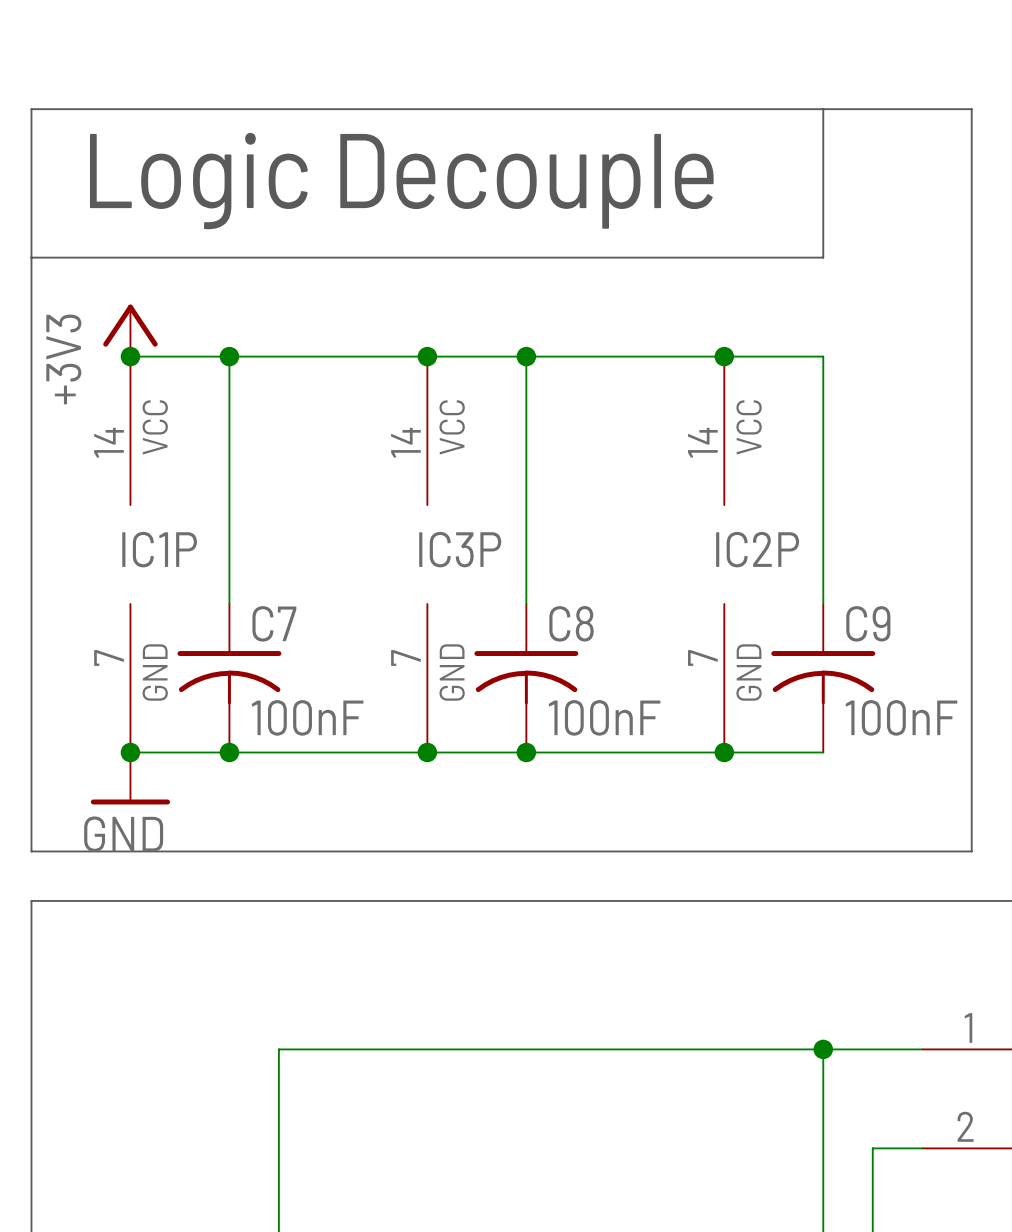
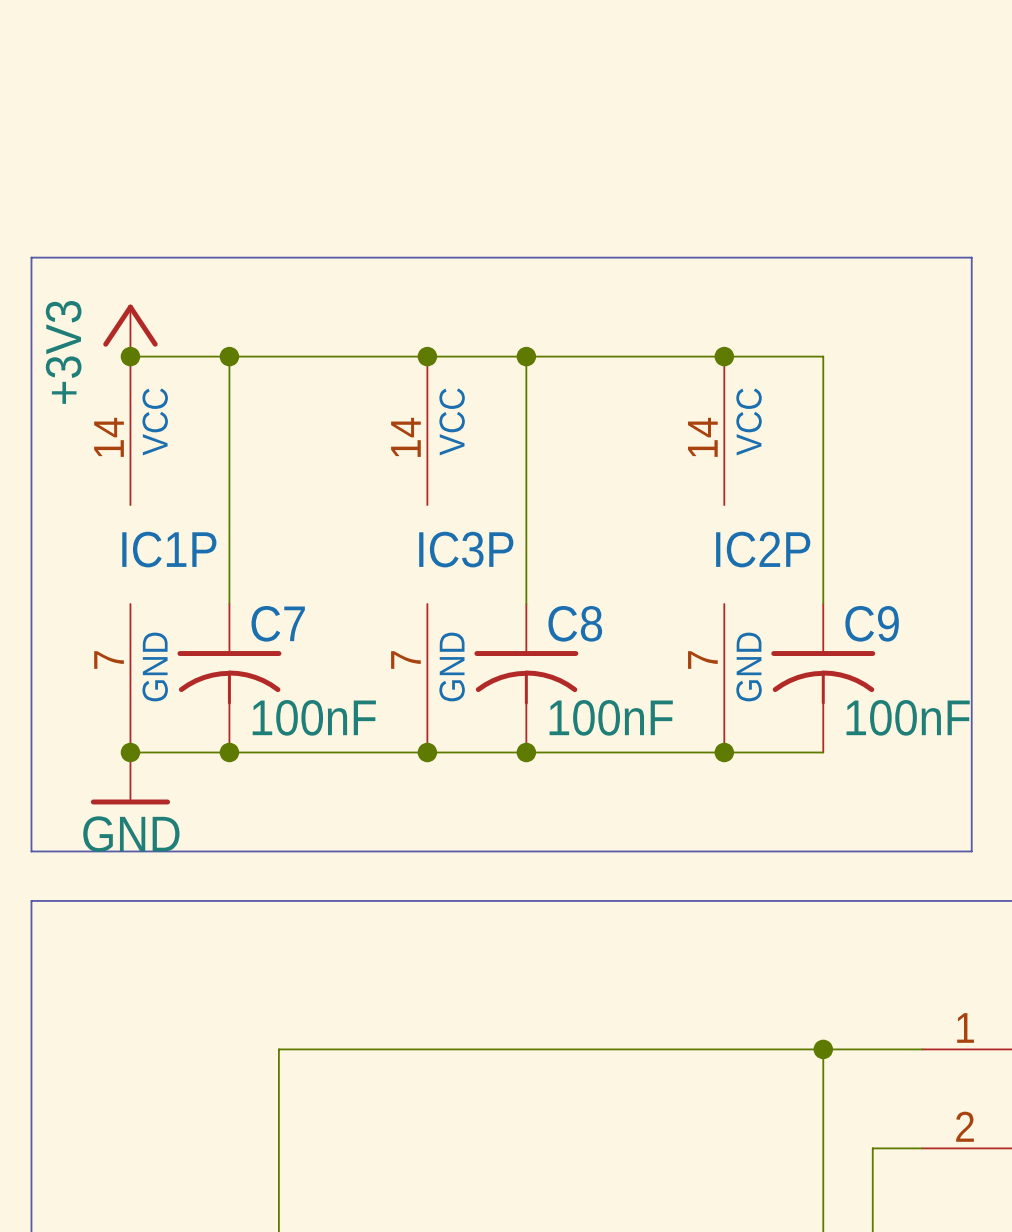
bus: (823, 109) (823, 257) -> (971, 257) (823, 257)
text: Logic Decouple (401, 181) -> none
bus: (31, 257) (31, 109) (971, 109) (971, 257) -> none

